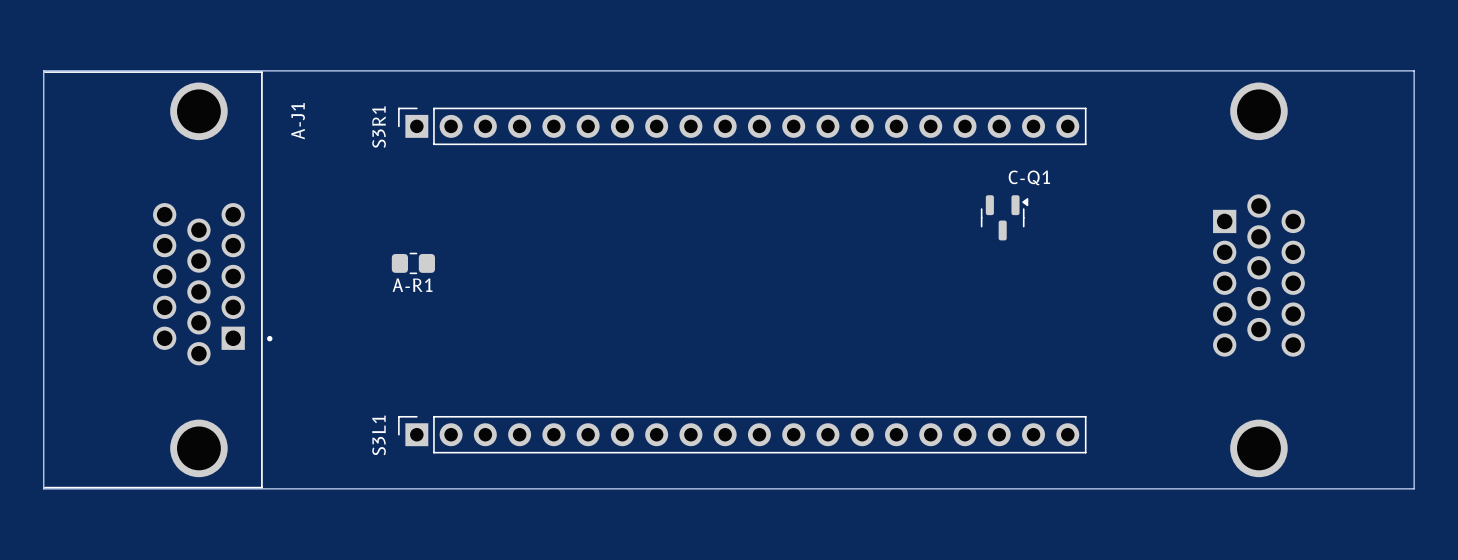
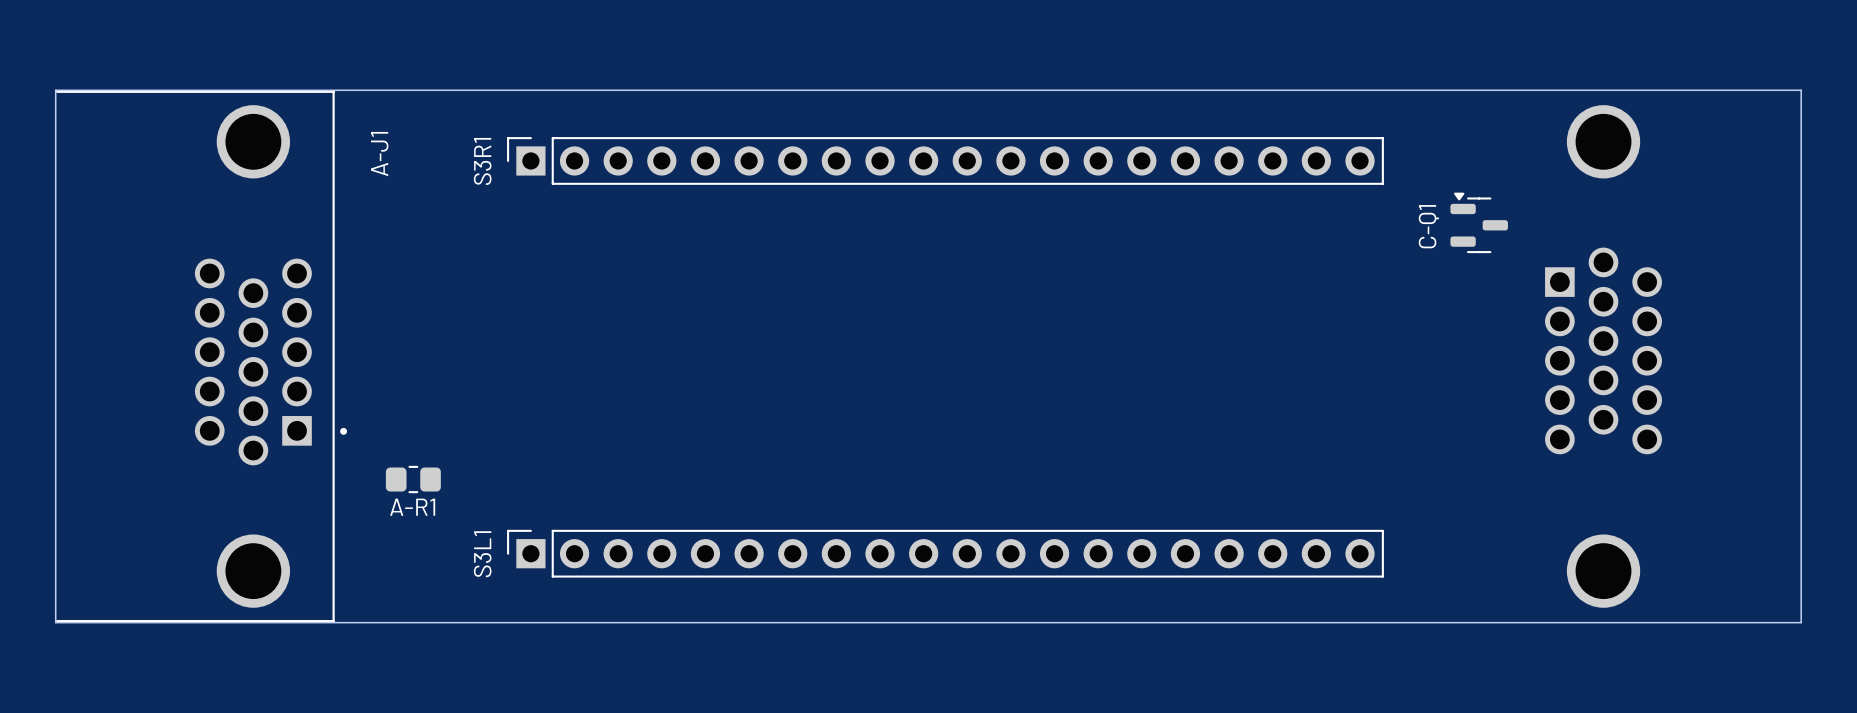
C-Q1 name position: C-Q1 (1029, 177) -> C-Q1 (1428, 226)
C-Q1 rotation: 0° (1004, 217) -> 90° counterclockwise (1479, 222)
C-Q1 position: (1004, 217) -> (1479, 222)
A-R1 position: (413, 263) -> (413, 479)

